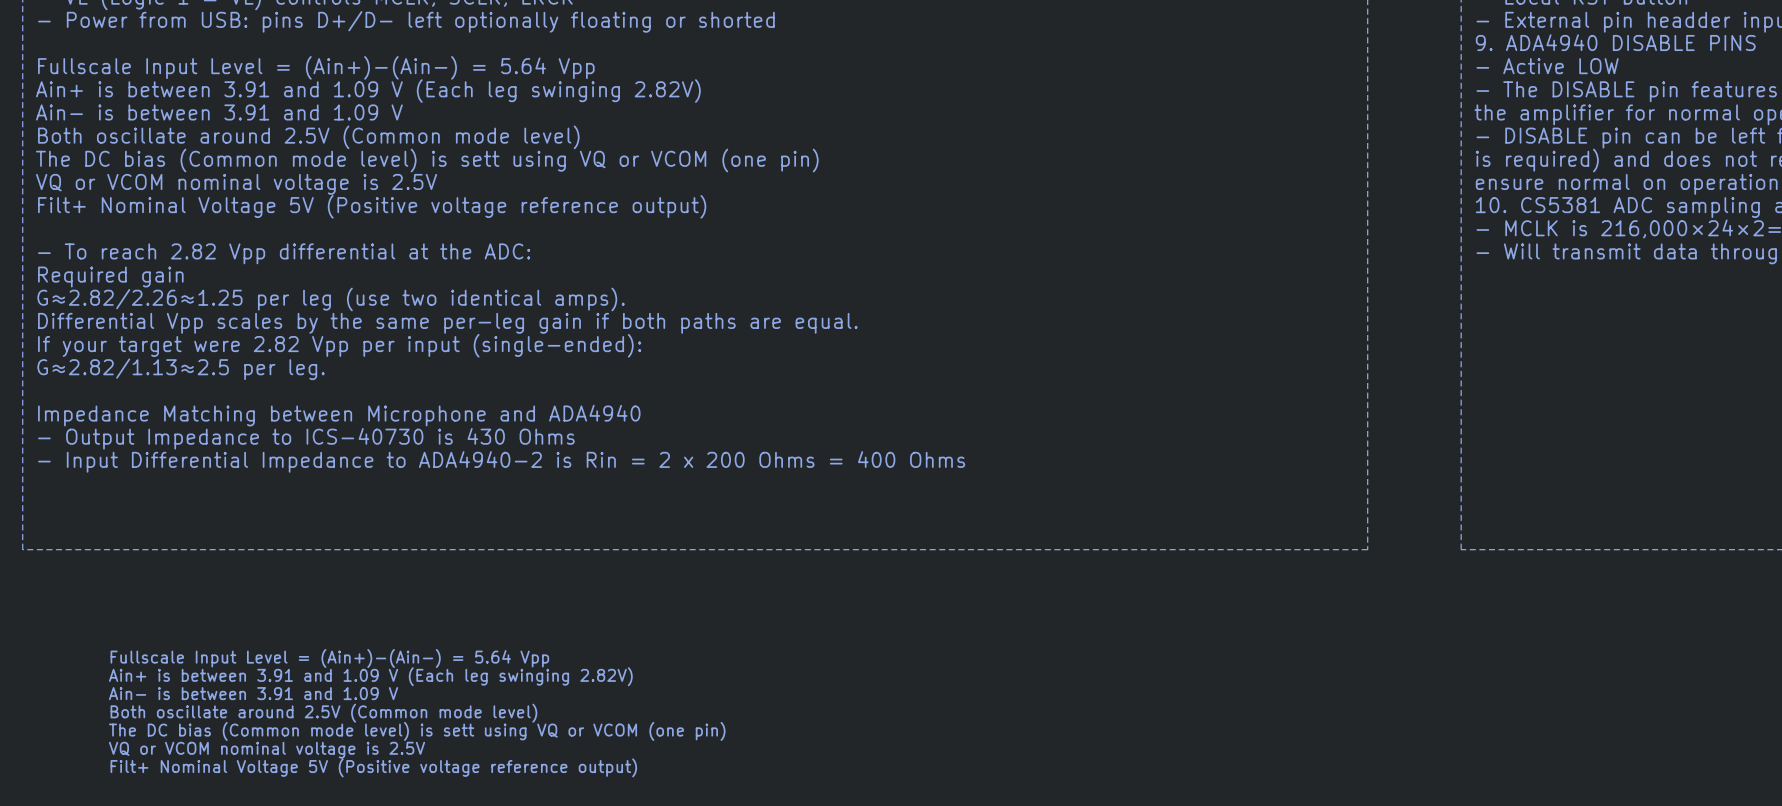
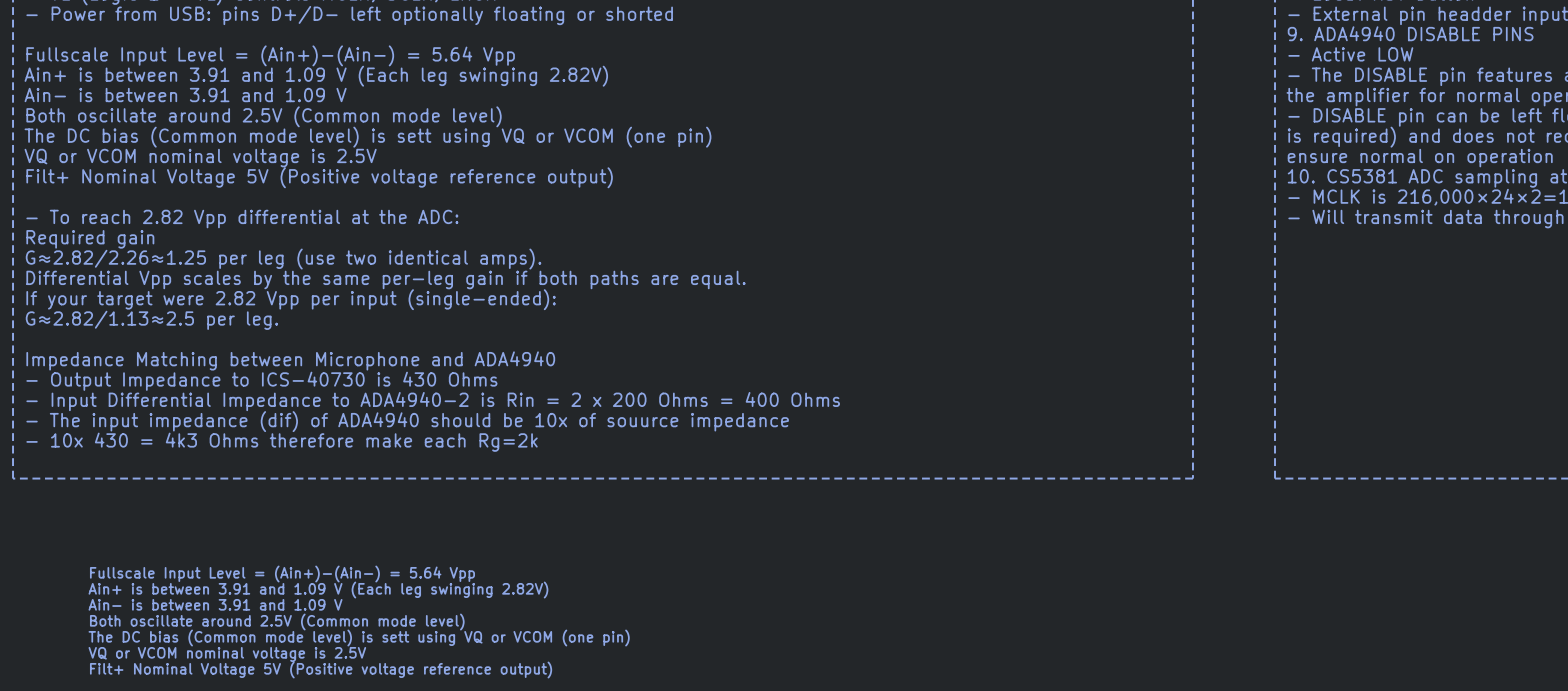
text: none -> - The input impedance (dif) of ADA4940 should be 10x of souurce impedance (407, 421)
text: none -> - 10x 430 = 4k3 Ohms therefore make each Rg=2k (282, 442)

